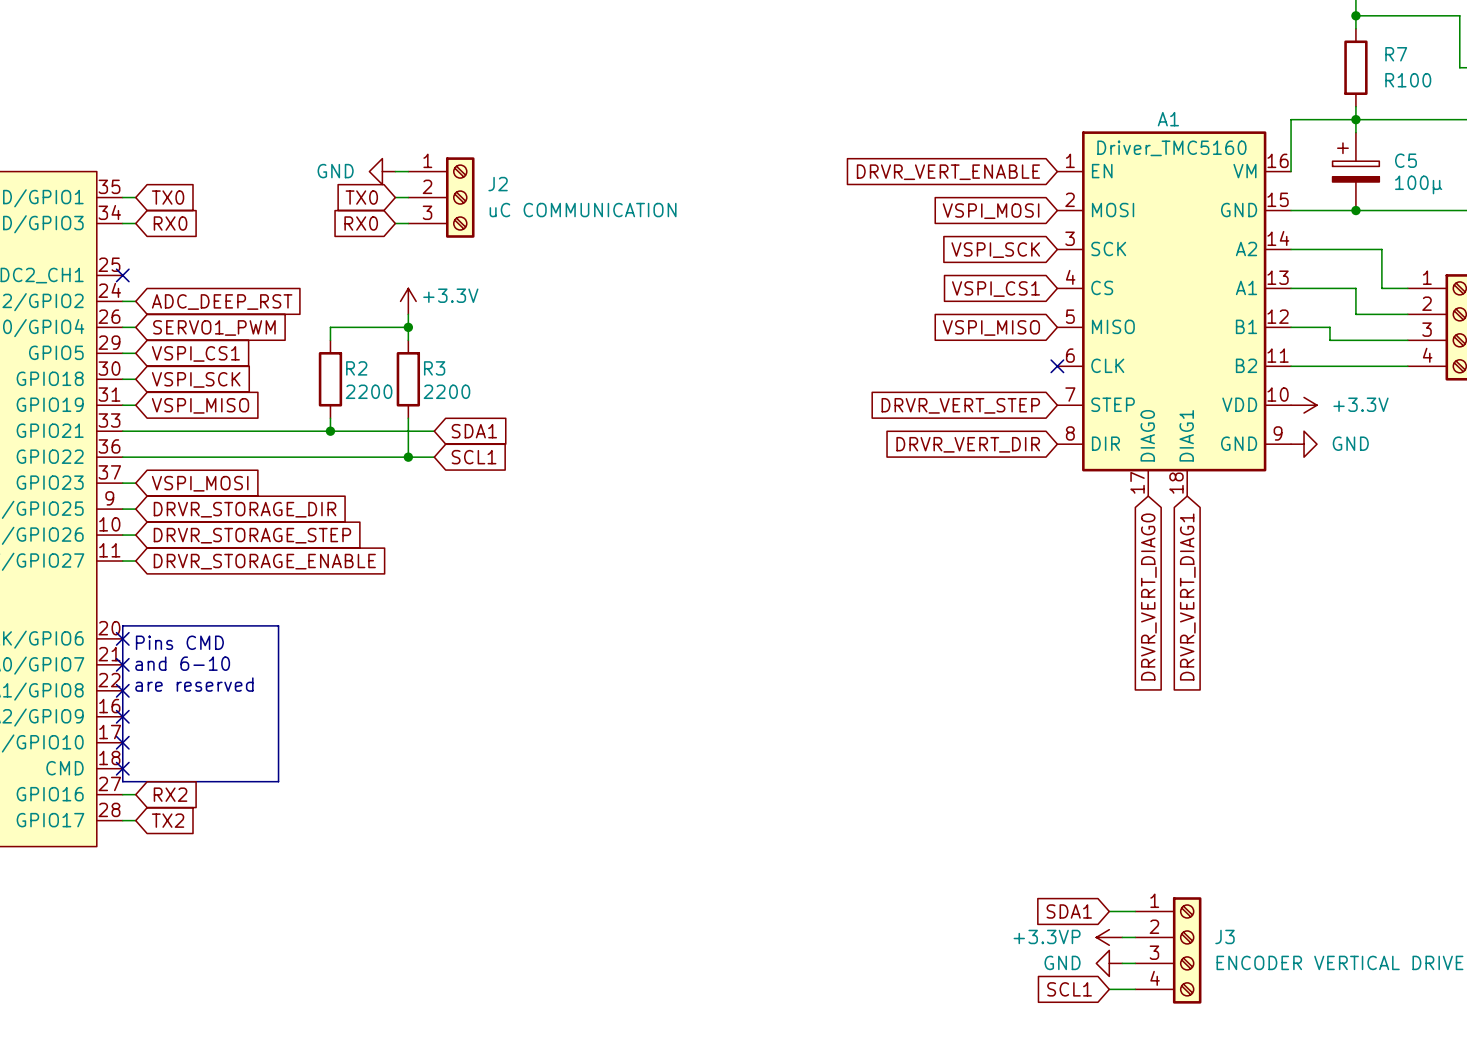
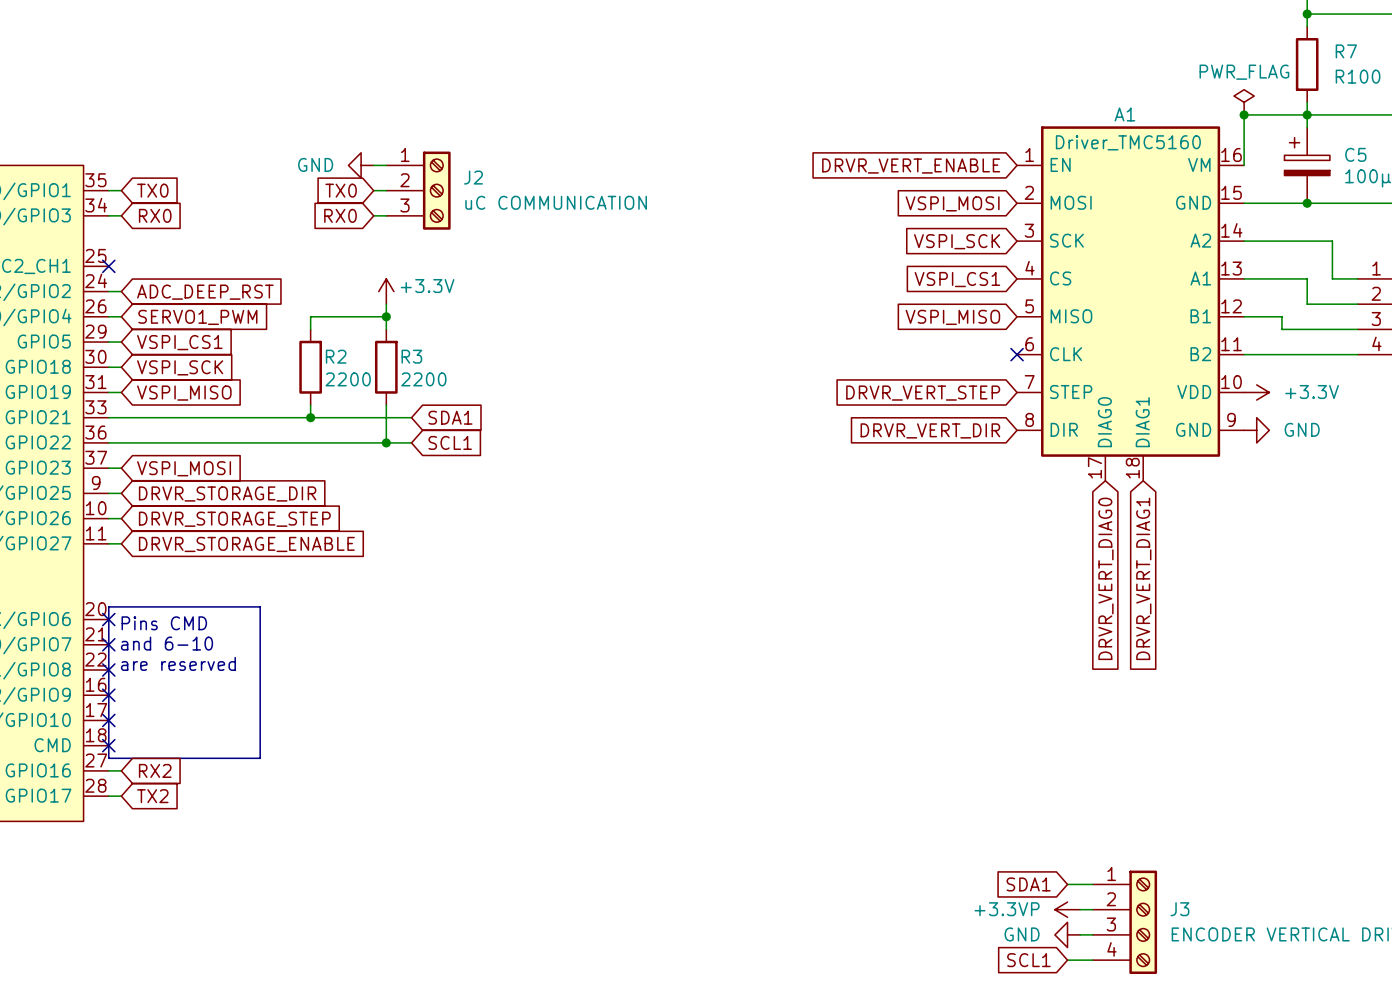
power symbol: none -> PWR_FLAG (1244, 102)
junction: none -> (1244, 114)

